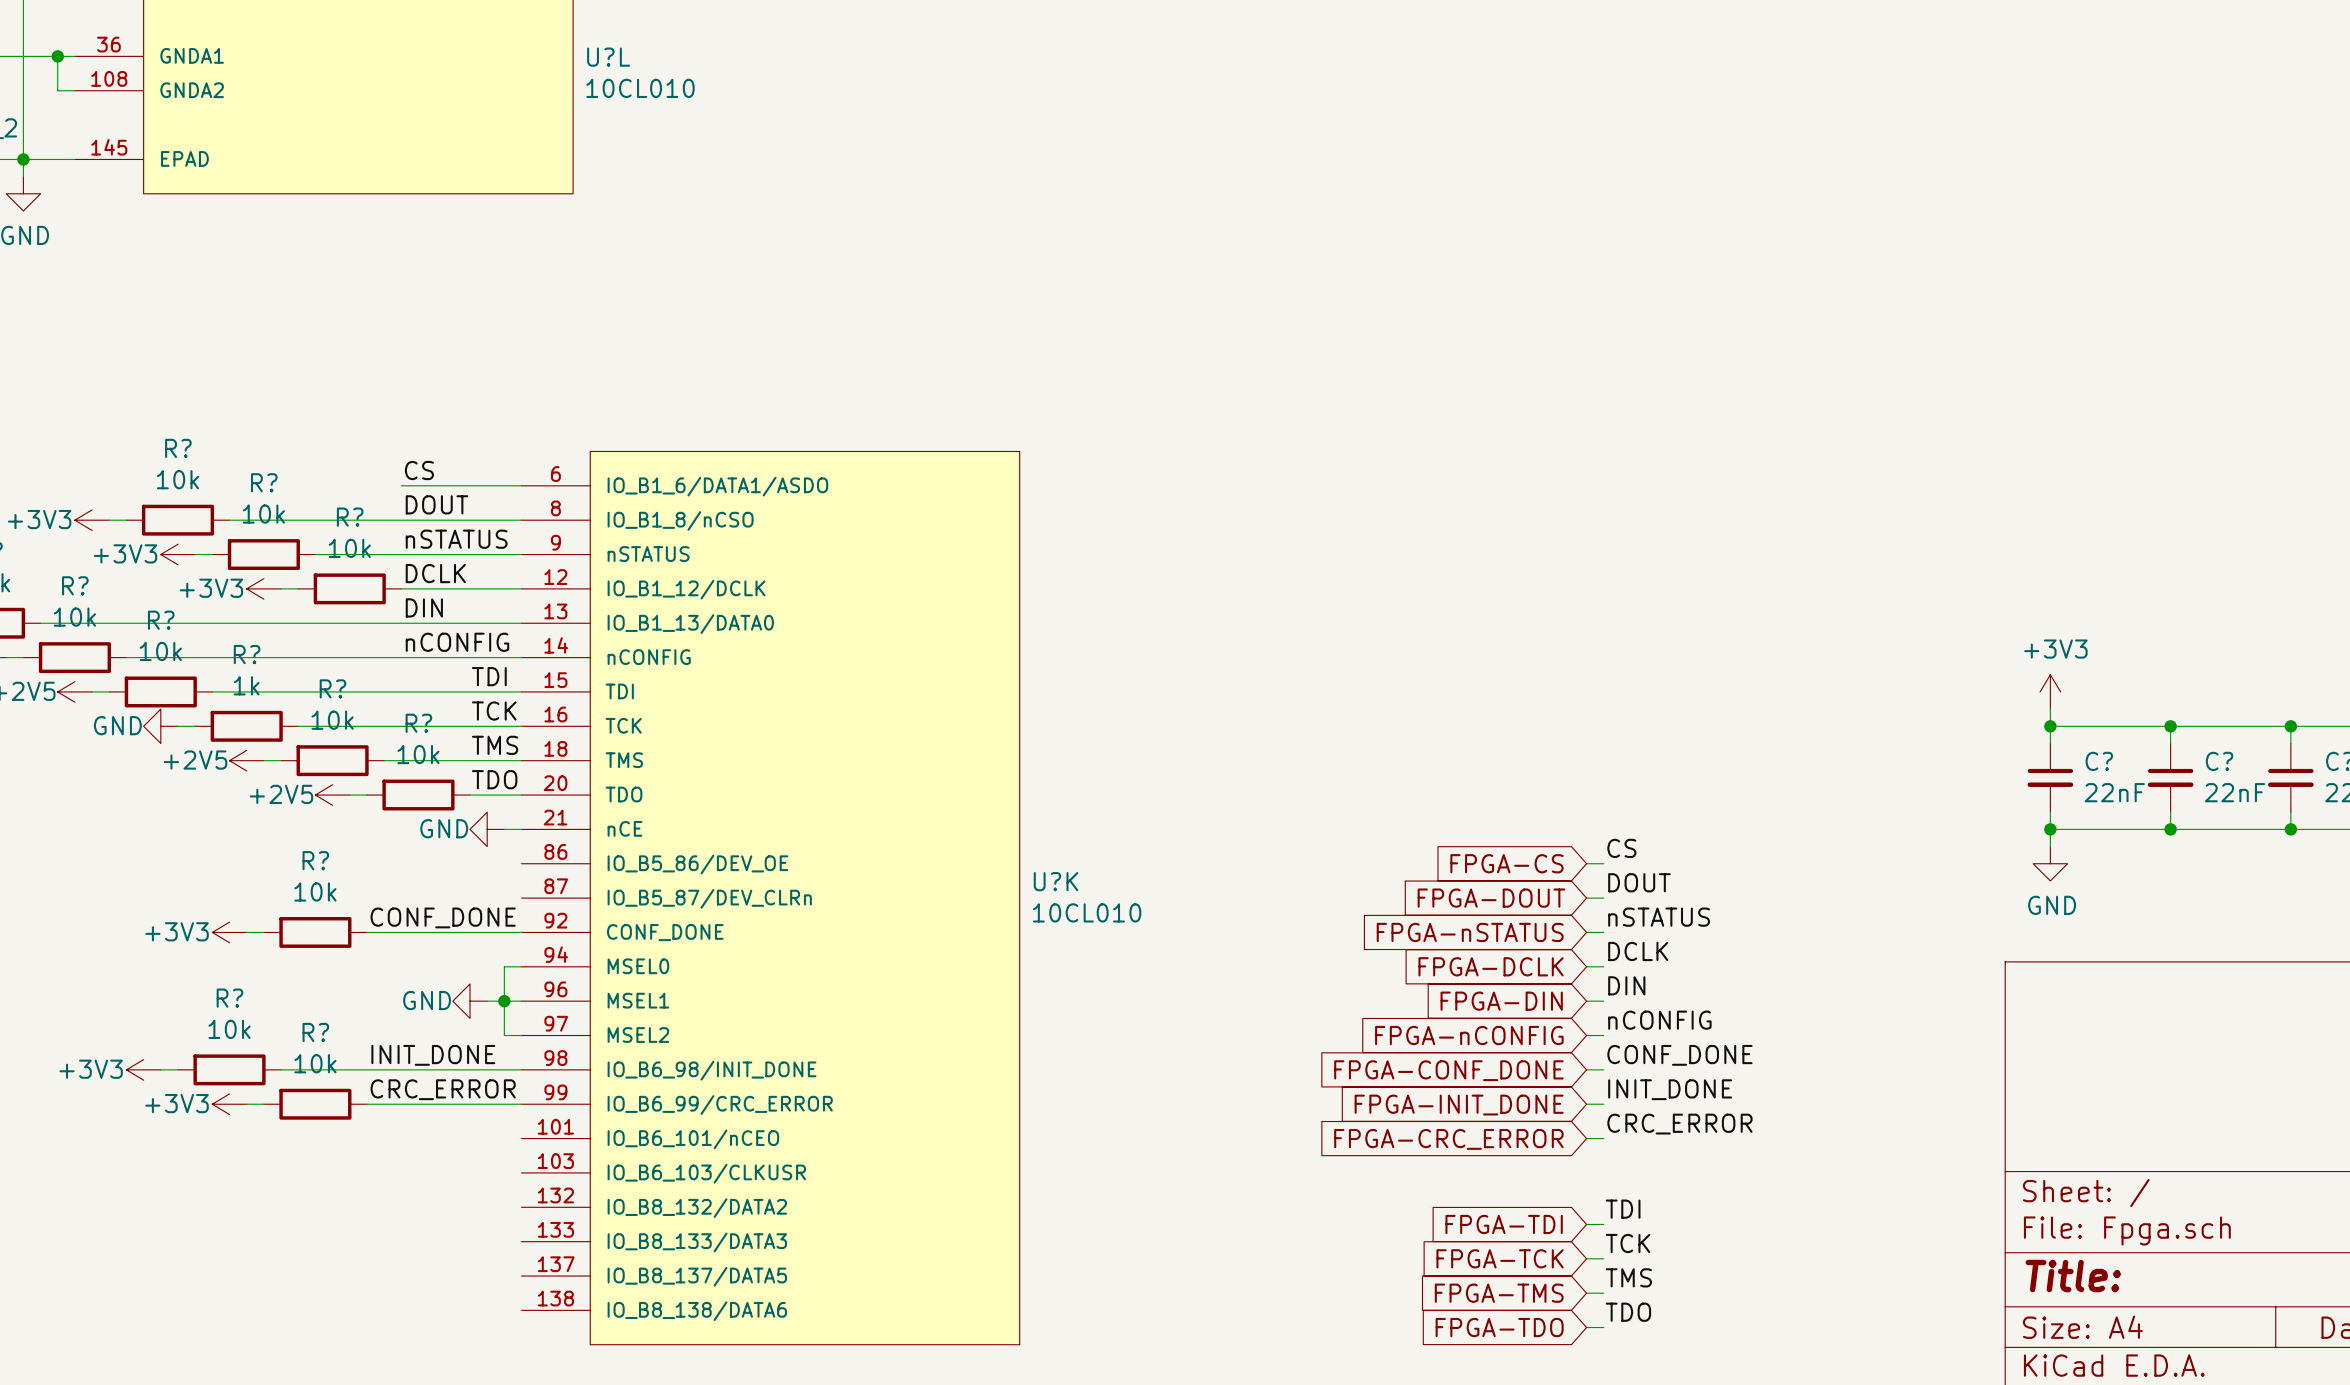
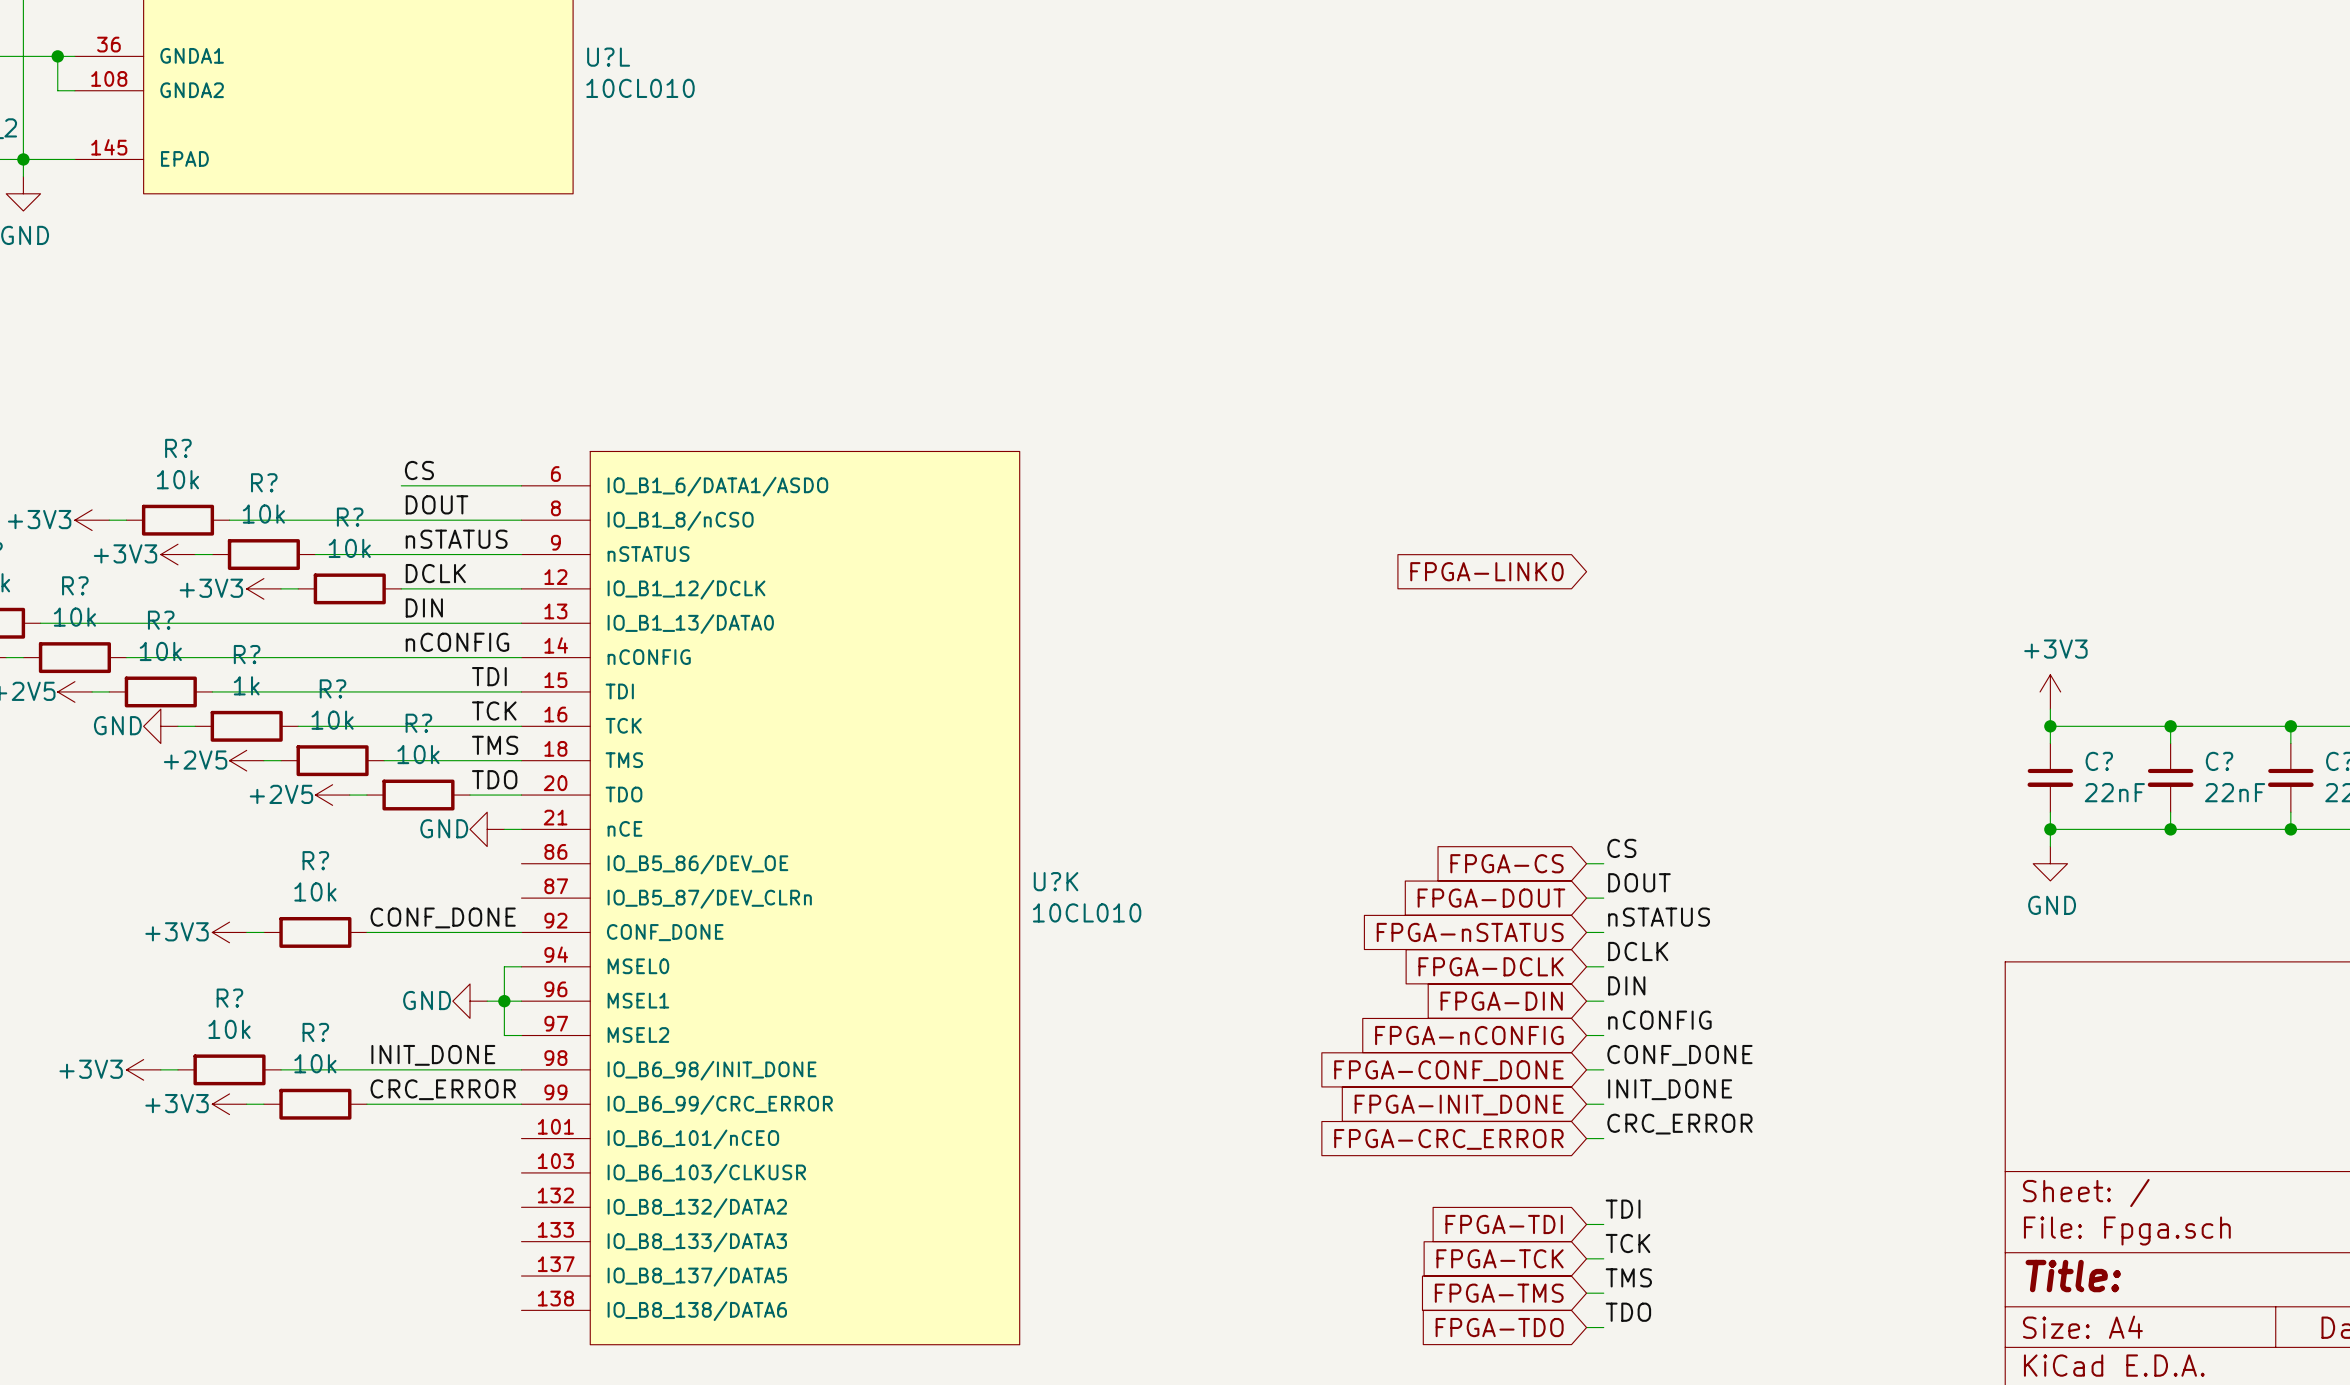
global label: none -> FPGA-LINK0 (1486, 571)

